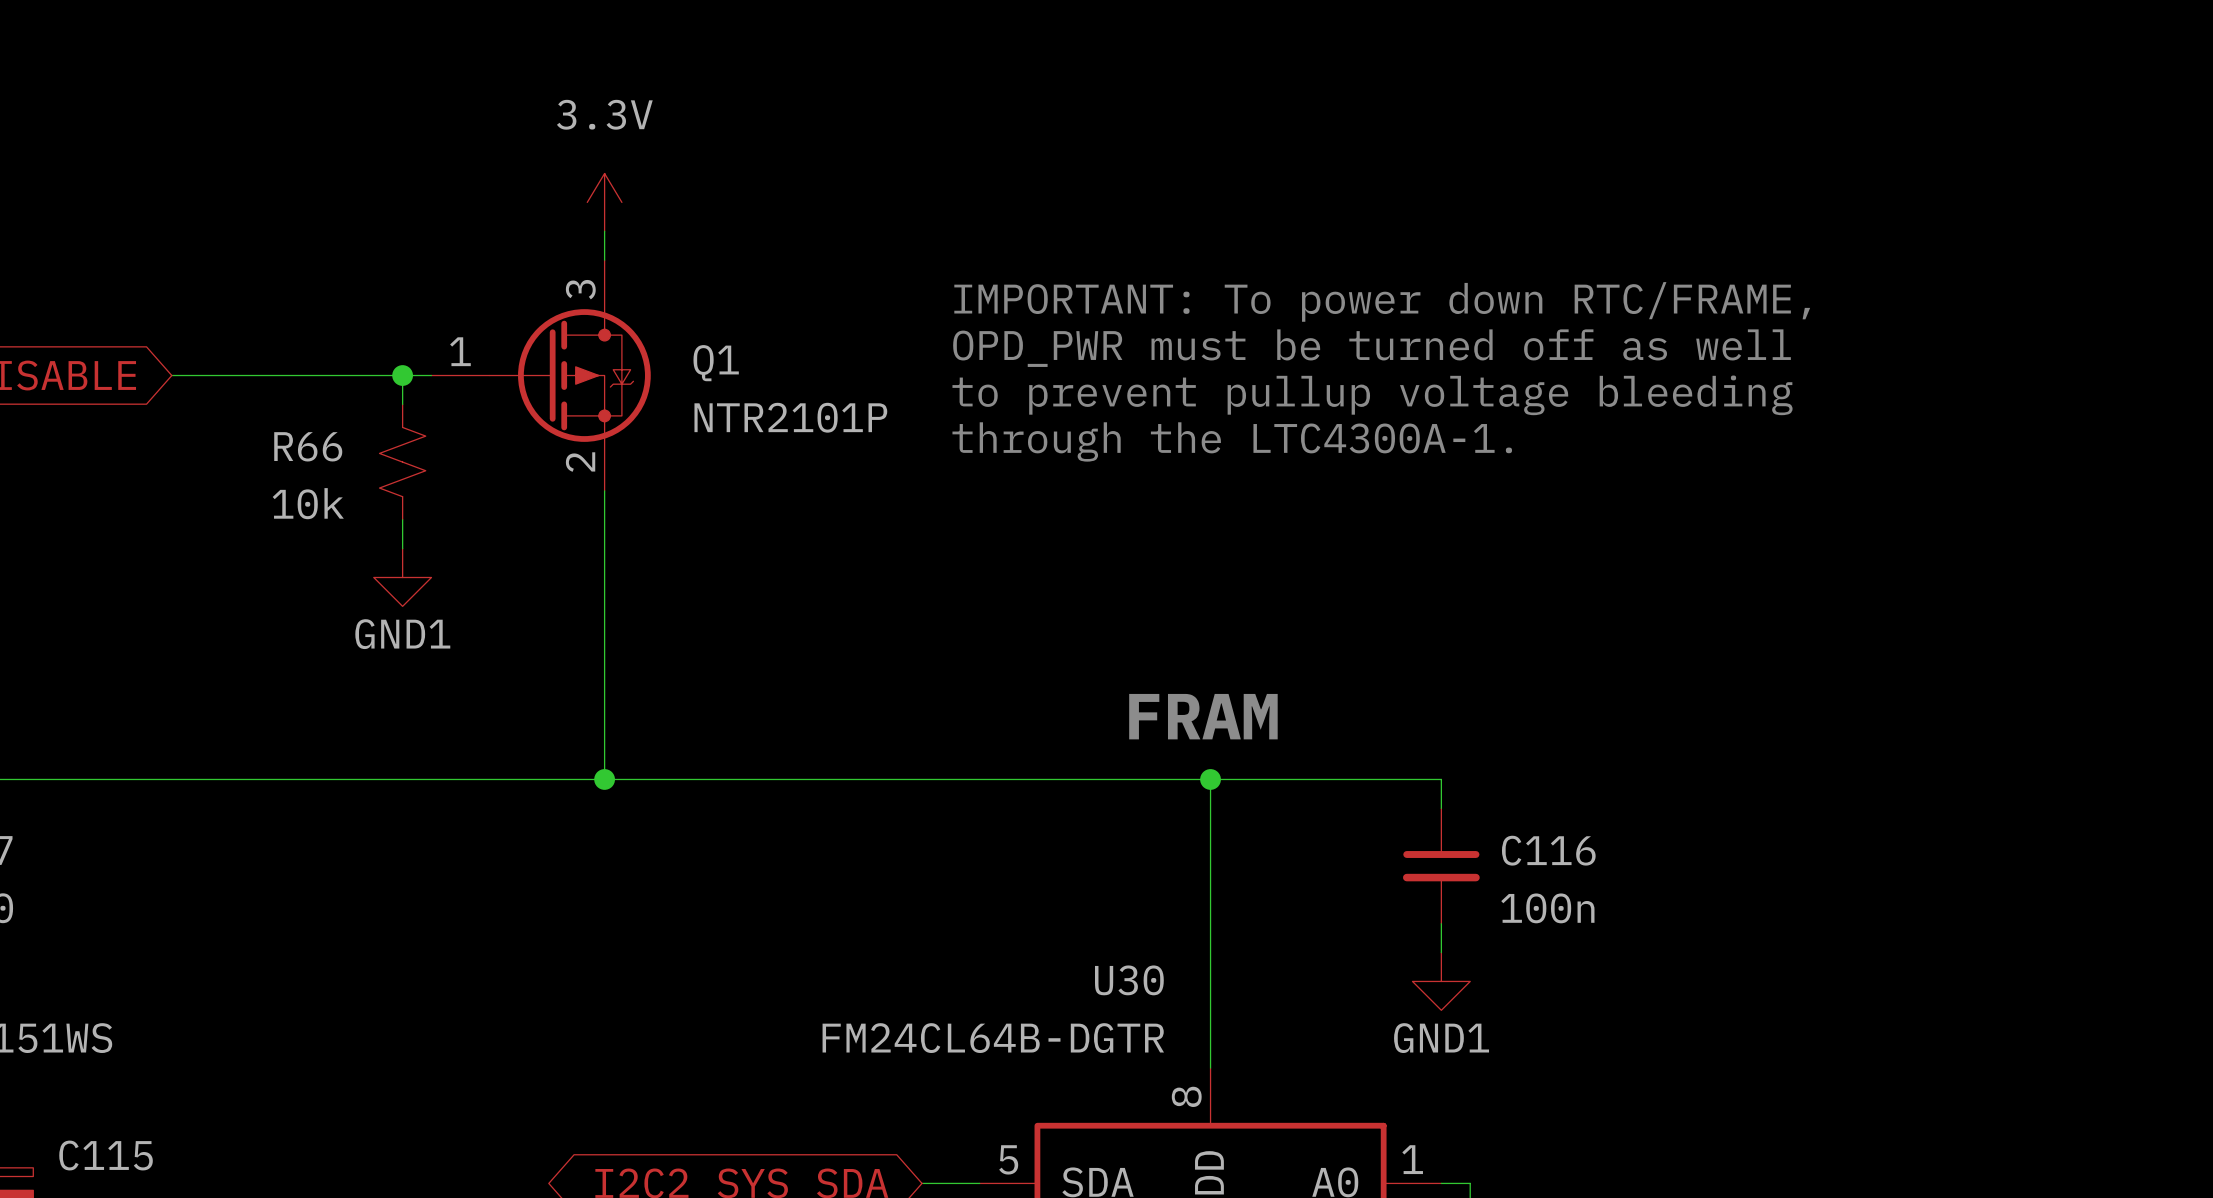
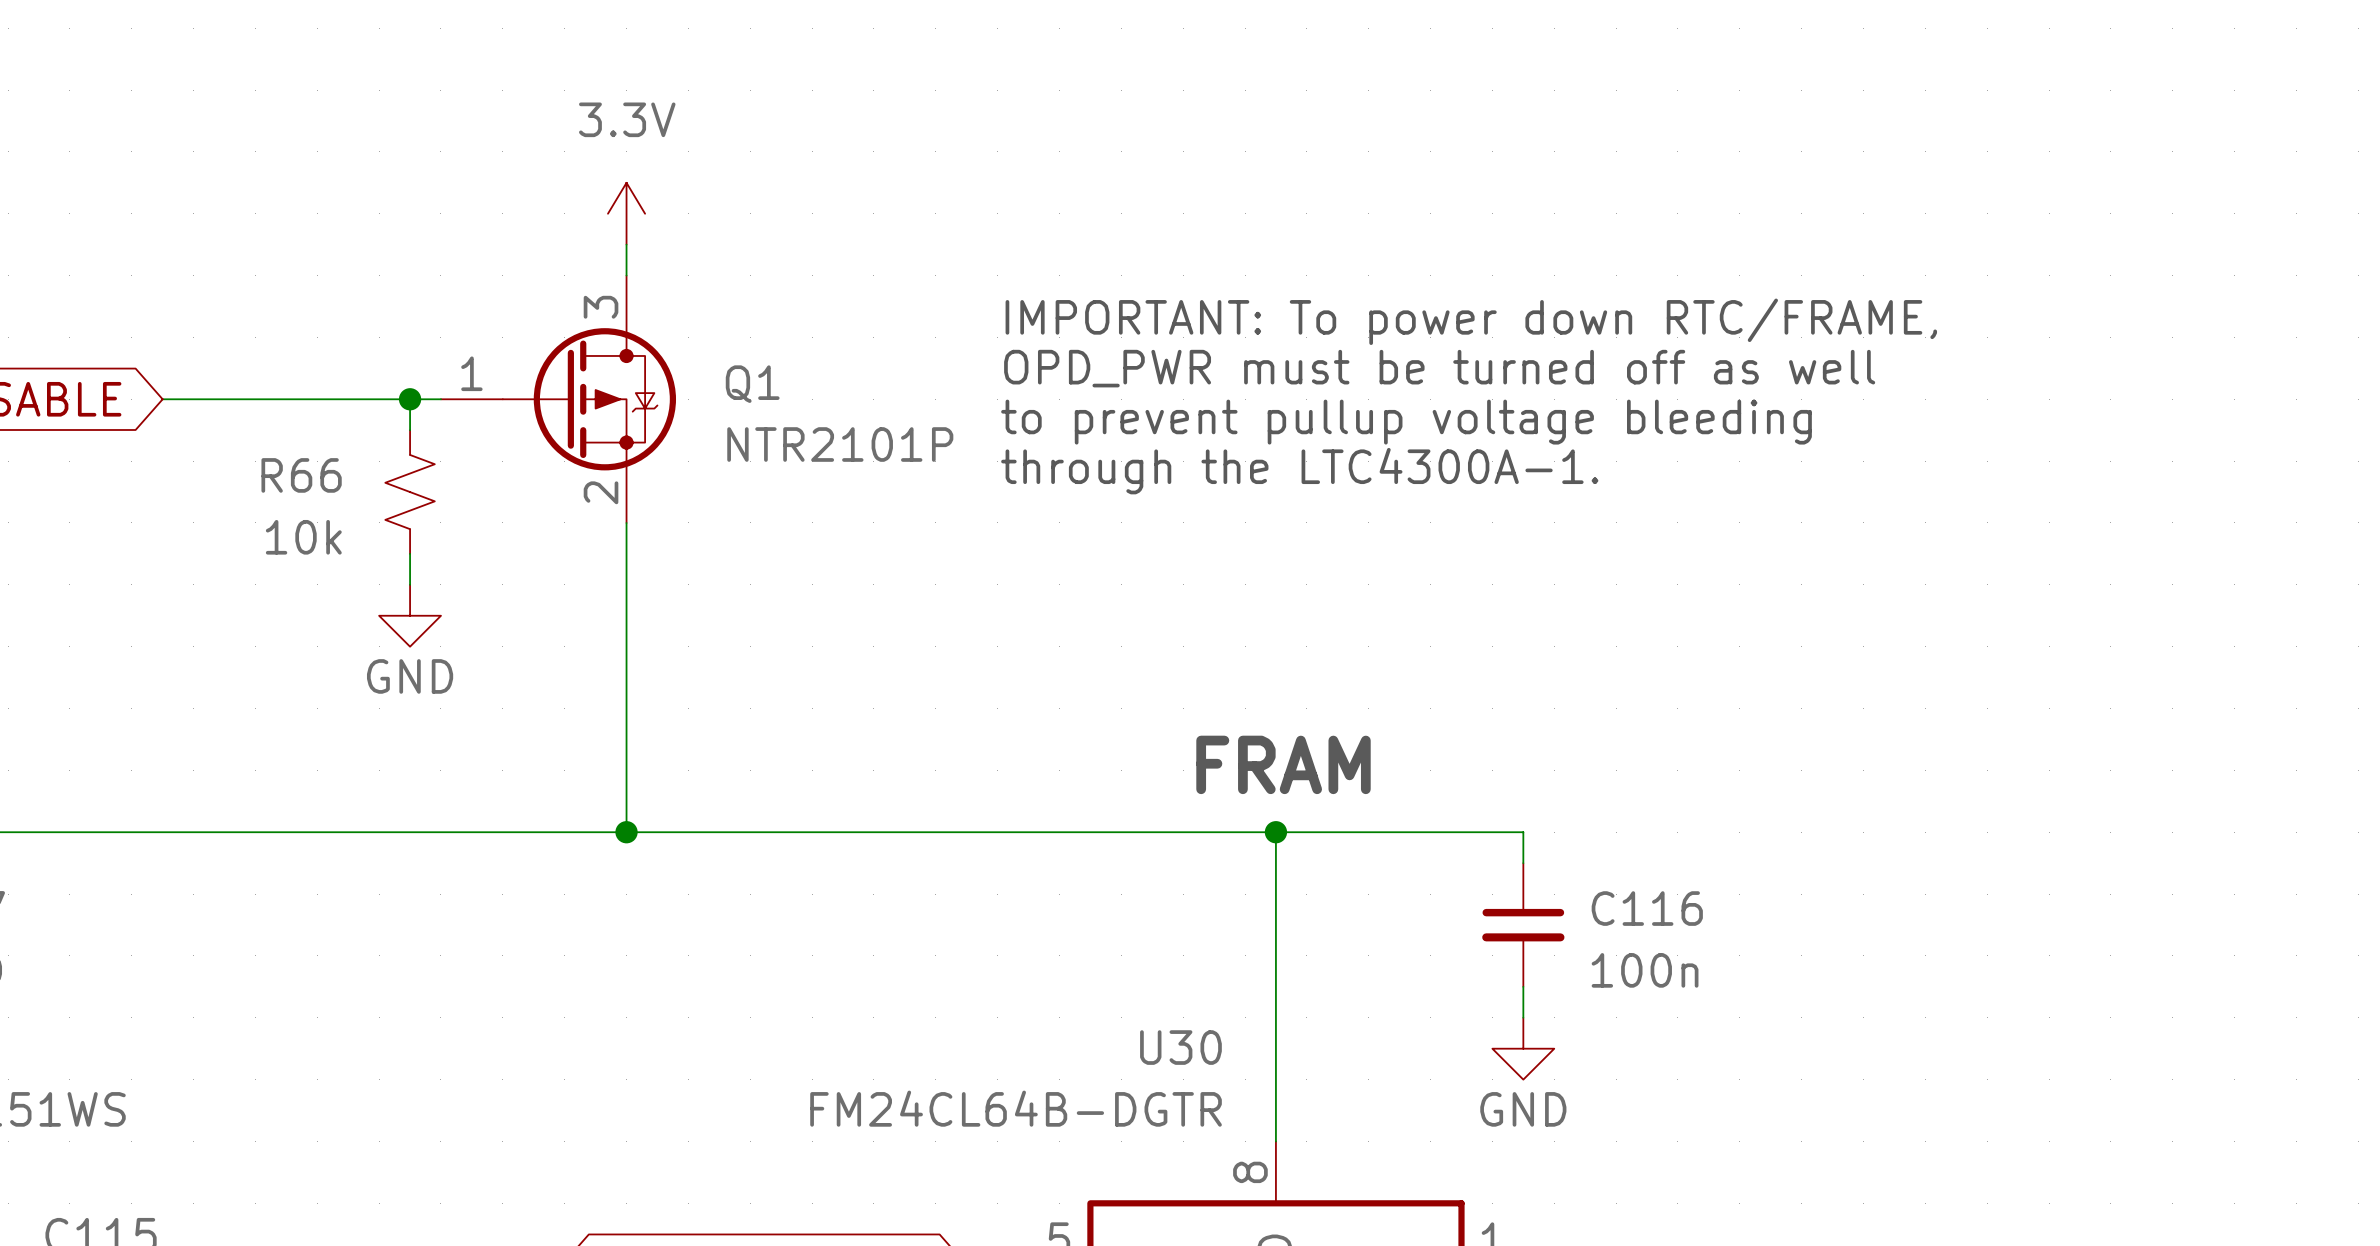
power symbol: GND1 (402, 577) -> GND (410, 615)
power symbol: GND1 (1441, 981) -> GND (1523, 1048)

